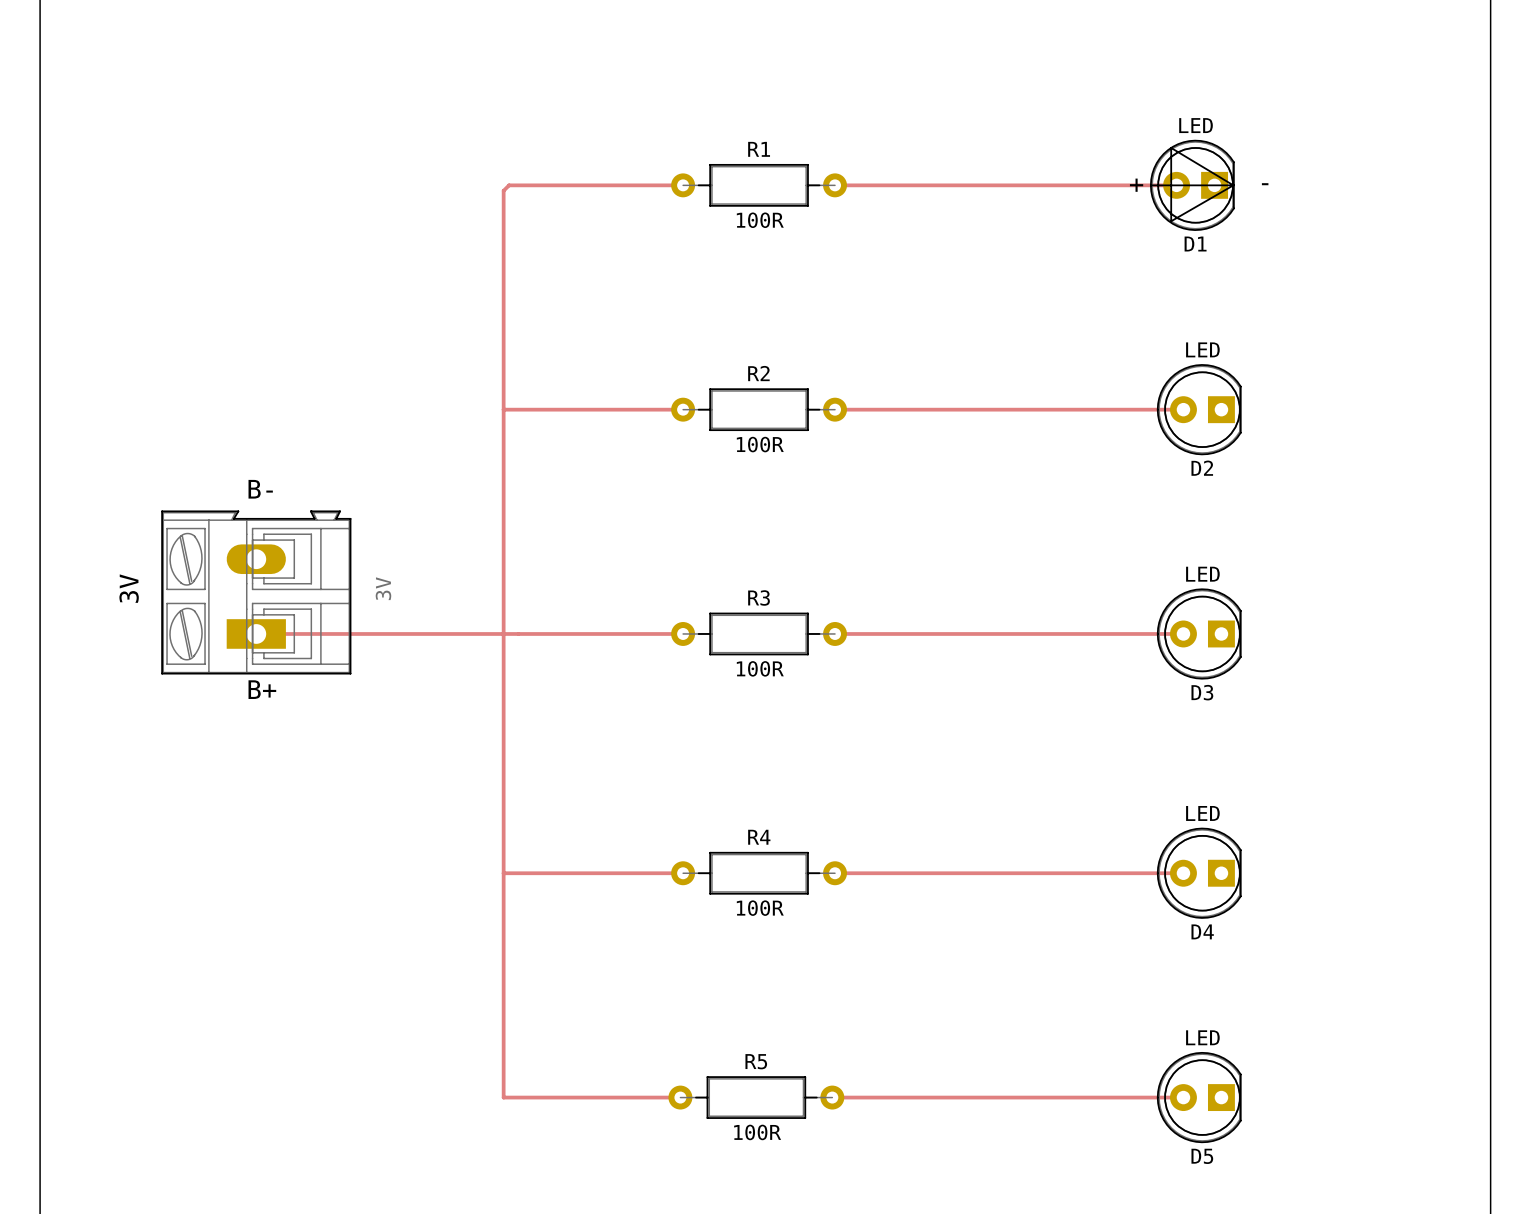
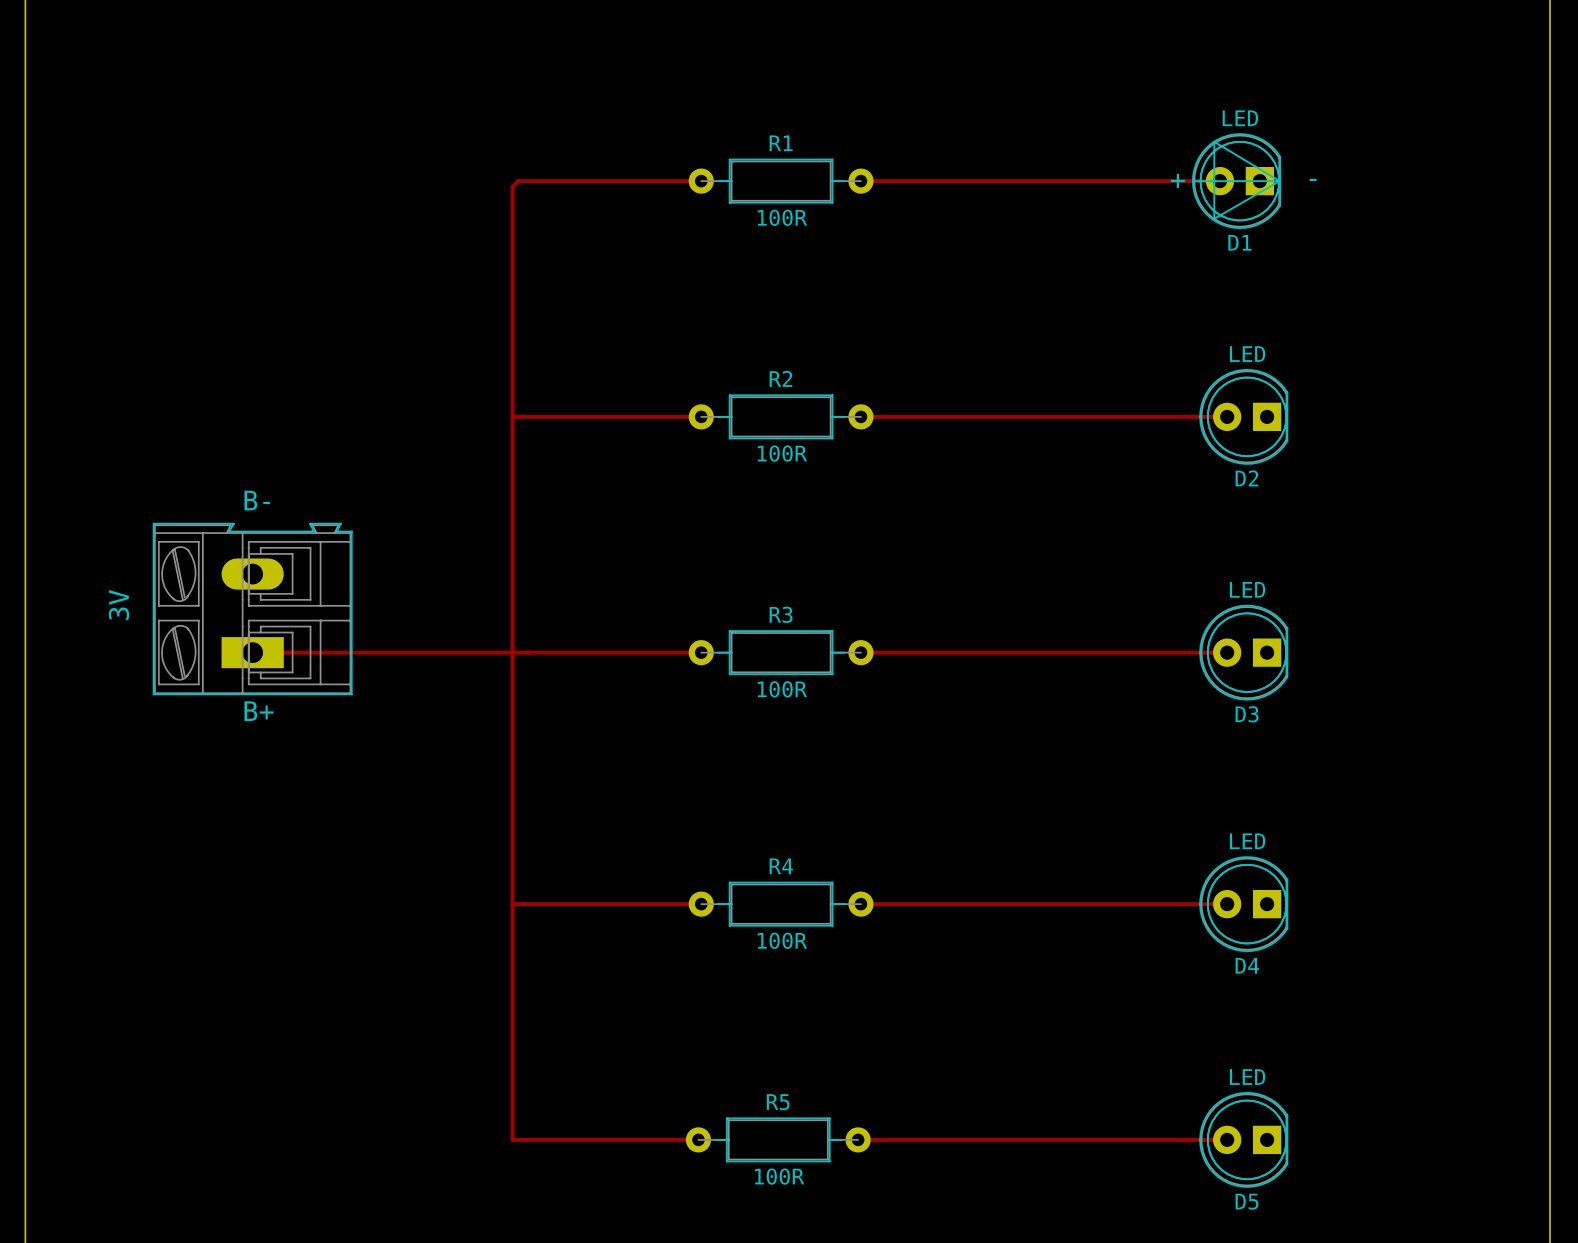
3V value: 3V (383, 588) -> none

